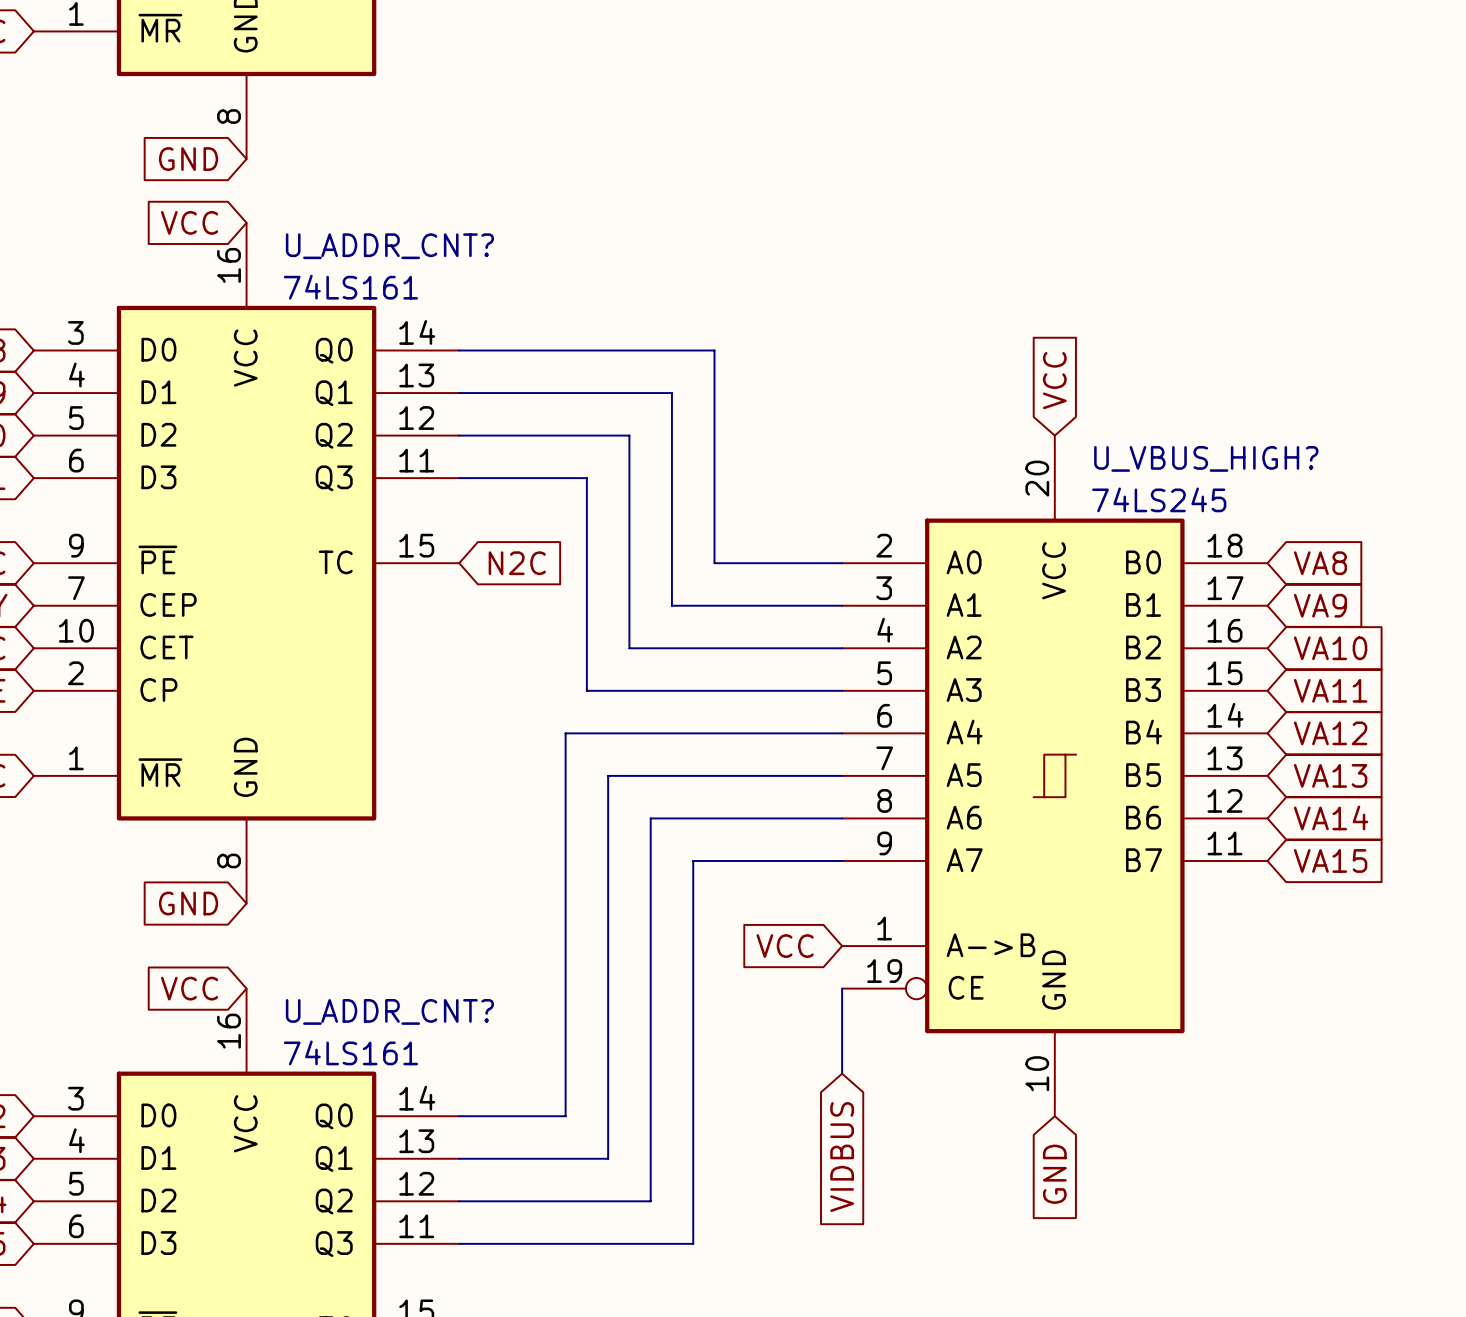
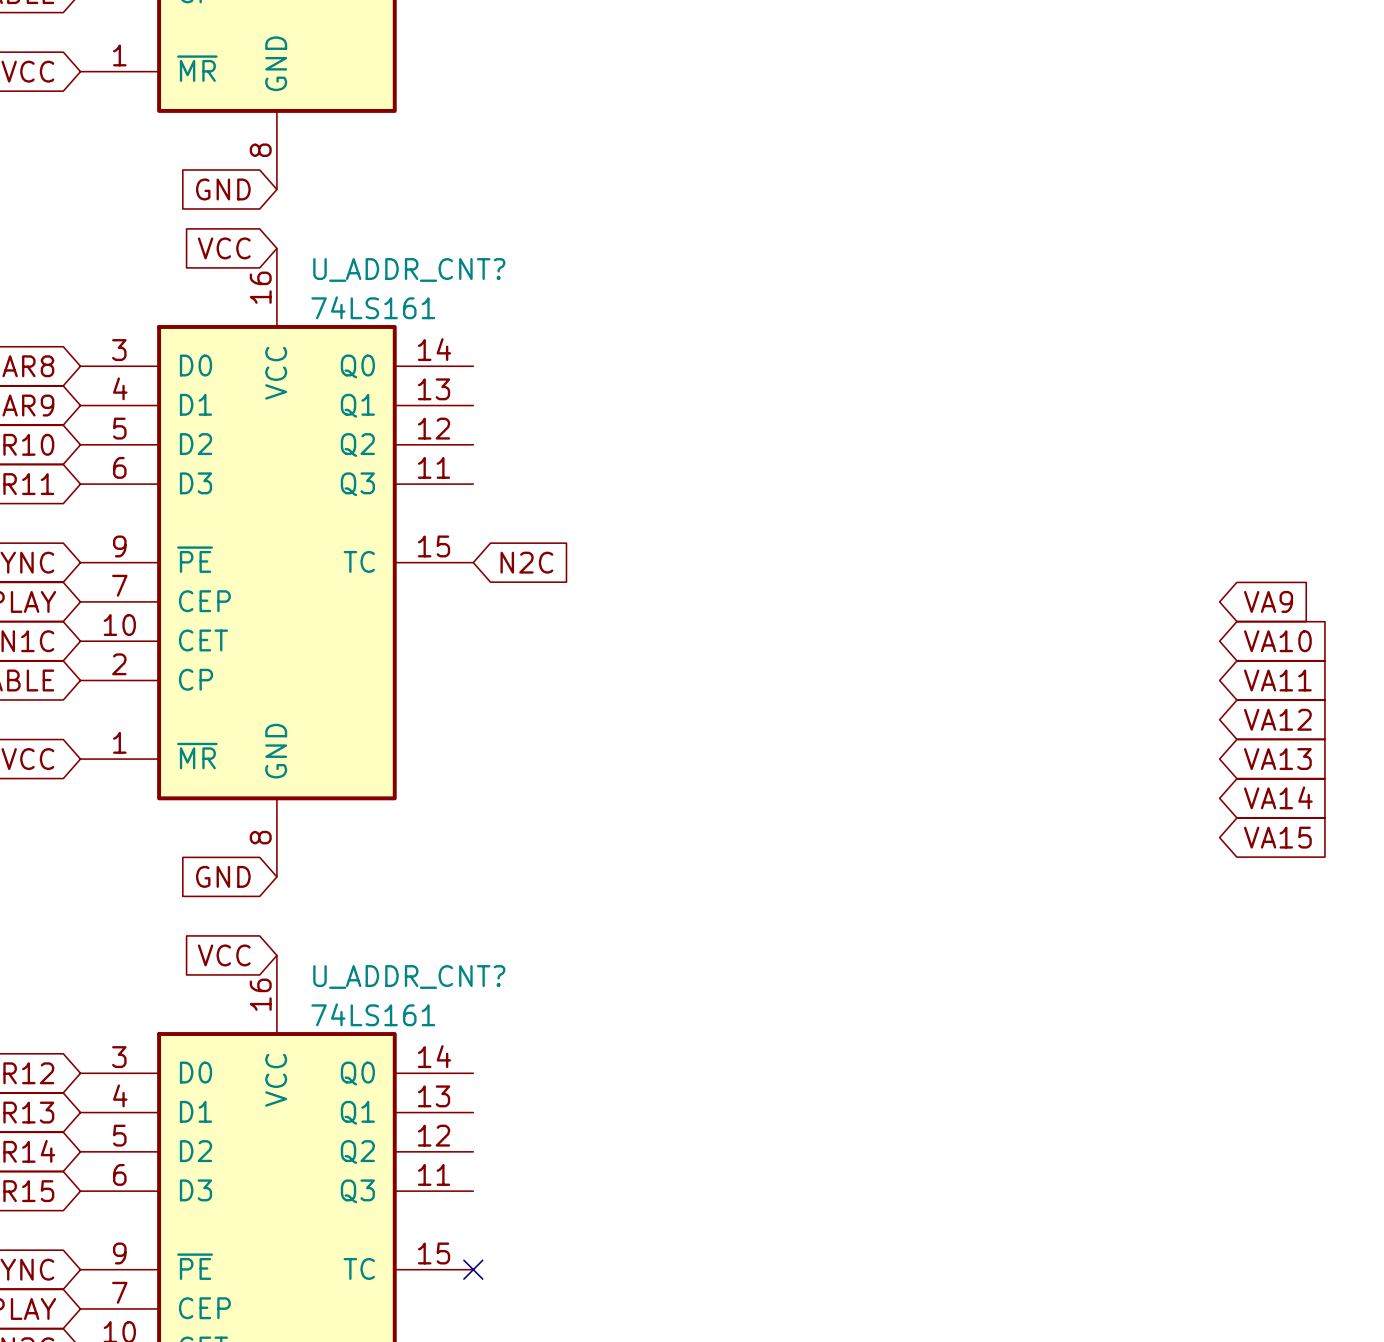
wire: (459, 350) (714, 350) (714, 563) (842, 563) -> none
global label: VCC (1054, 380) -> none
wire: (459, 393) (671, 393) (671, 605) (842, 605) -> none
wire: (459, 435) (629, 435) (629, 648) (842, 648) -> none
wire: (459, 478) (586, 478) (586, 690) (842, 690) -> none
global label: VA8 (1320, 563) -> none
wire: (842, 733) (565, 733) (565, 1116) (459, 1116) -> none
wire: (842, 775) (608, 775) (608, 1158) (459, 1158) -> none
U_VBUS_HIGH?: 74LS245 (1054, 775) -> none
wire: (842, 818) (650, 818) (650, 1201) (459, 1201) -> none
wire: (842, 860) (693, 860) (693, 1243) (459, 1243) -> none
global label: VCC (785, 946) -> none
wire: (842, 988) (842, 1073) -> none
global label: VIDBUS (842, 1157) -> none
global label: GND (1054, 1174) -> none

